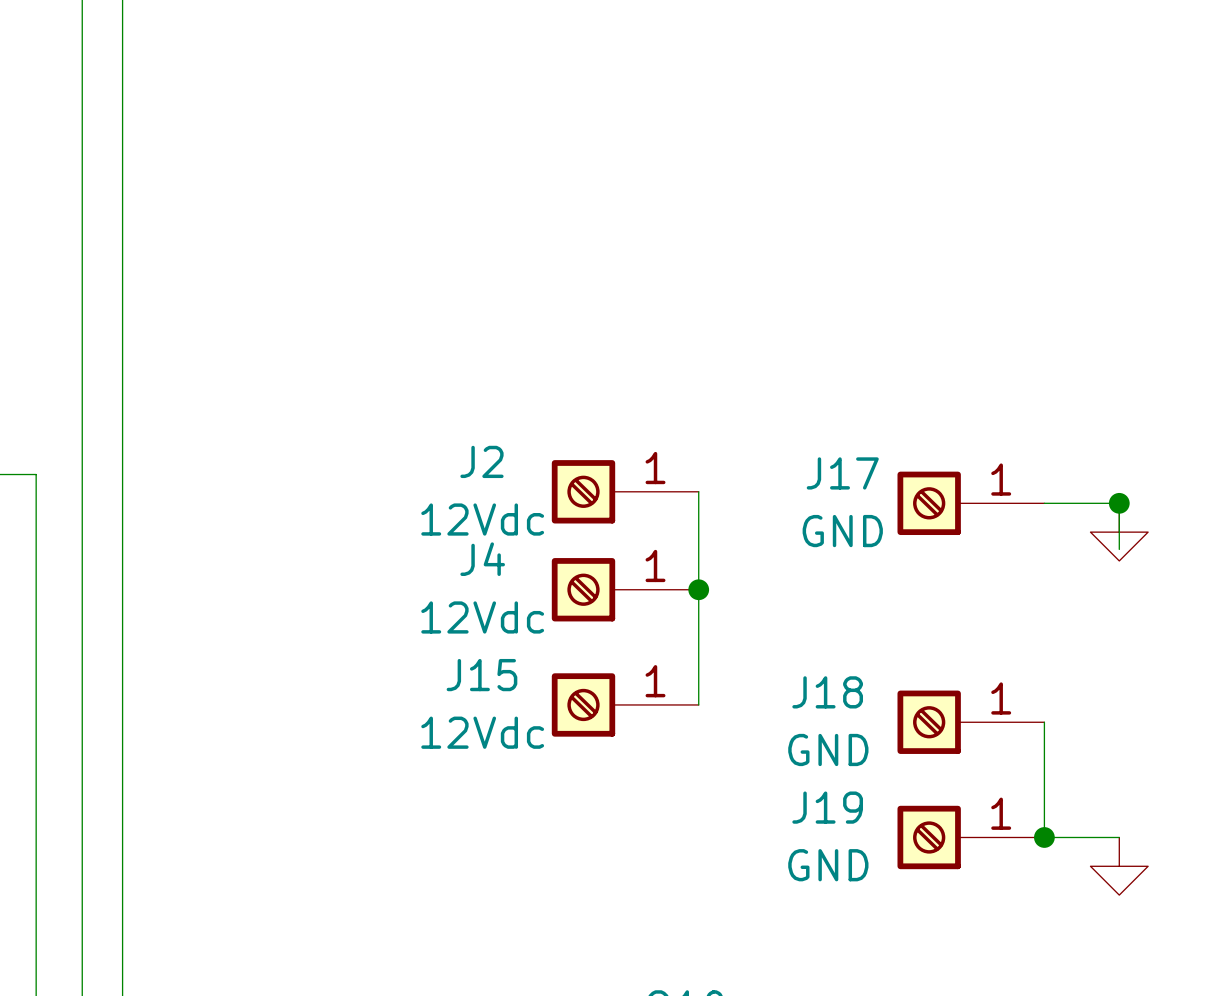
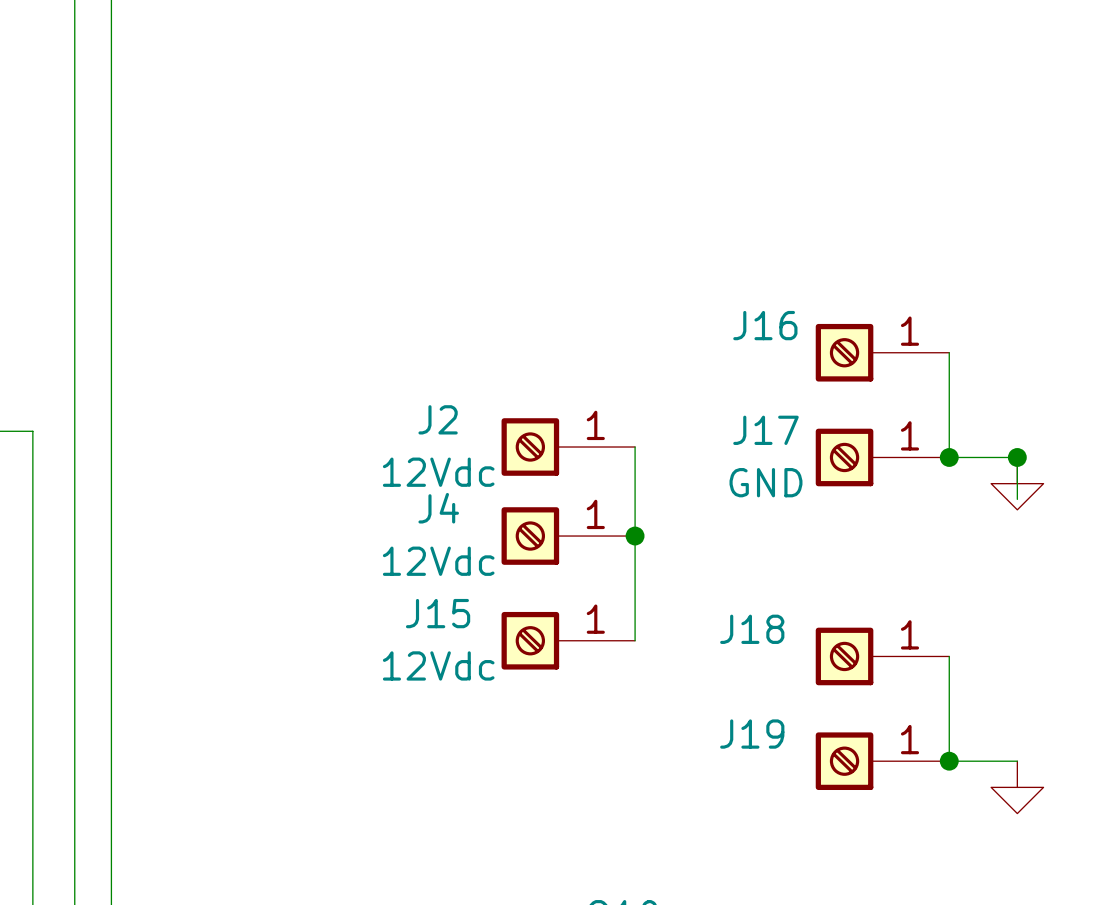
J16: none -> (882, 352)
wire: none -> (949, 352) (949, 457)
junction: none -> (949, 457)
J18 value: GND (828, 749) -> none
J19 value: GND (828, 865) -> none

